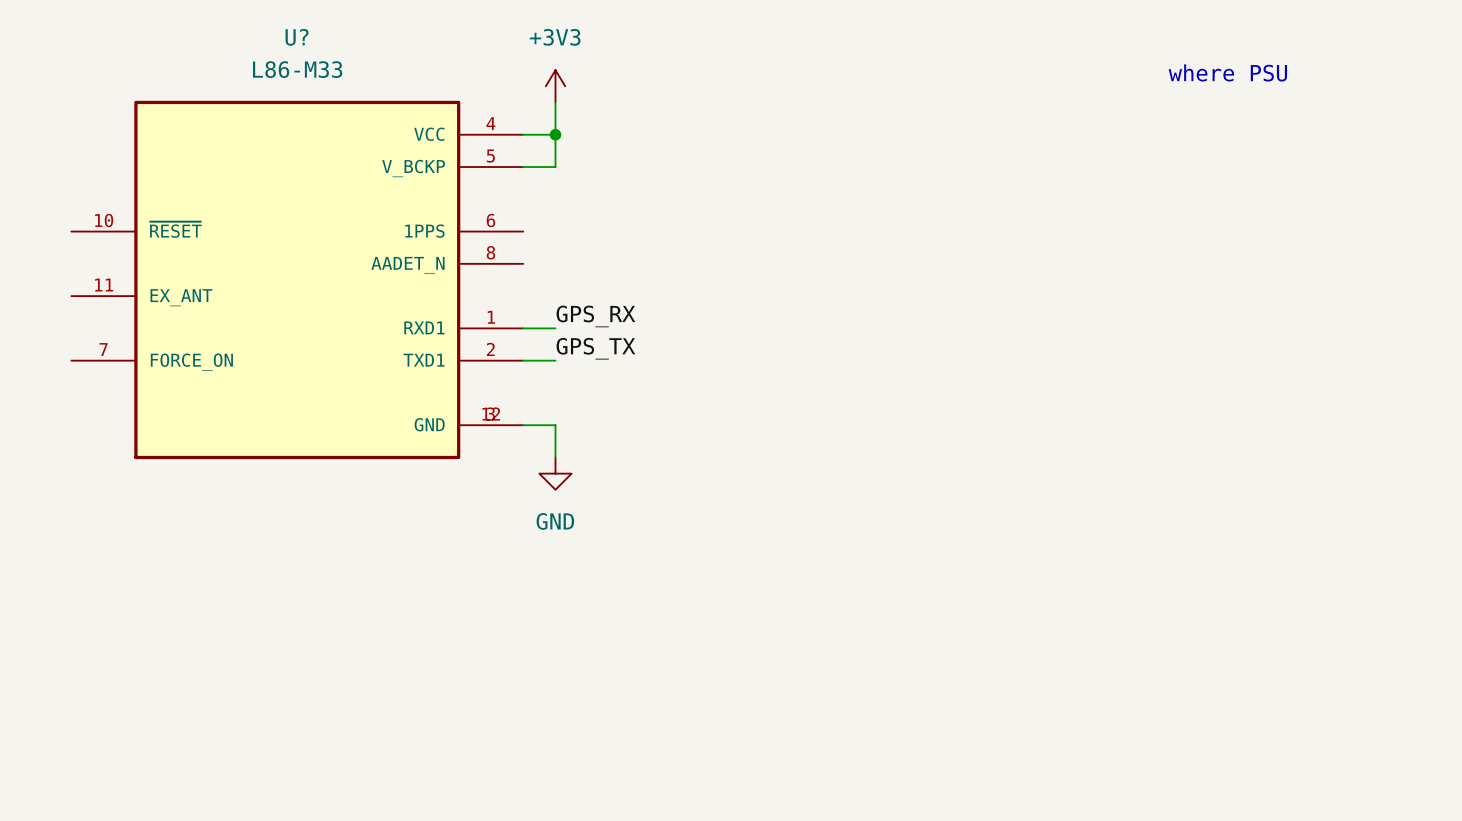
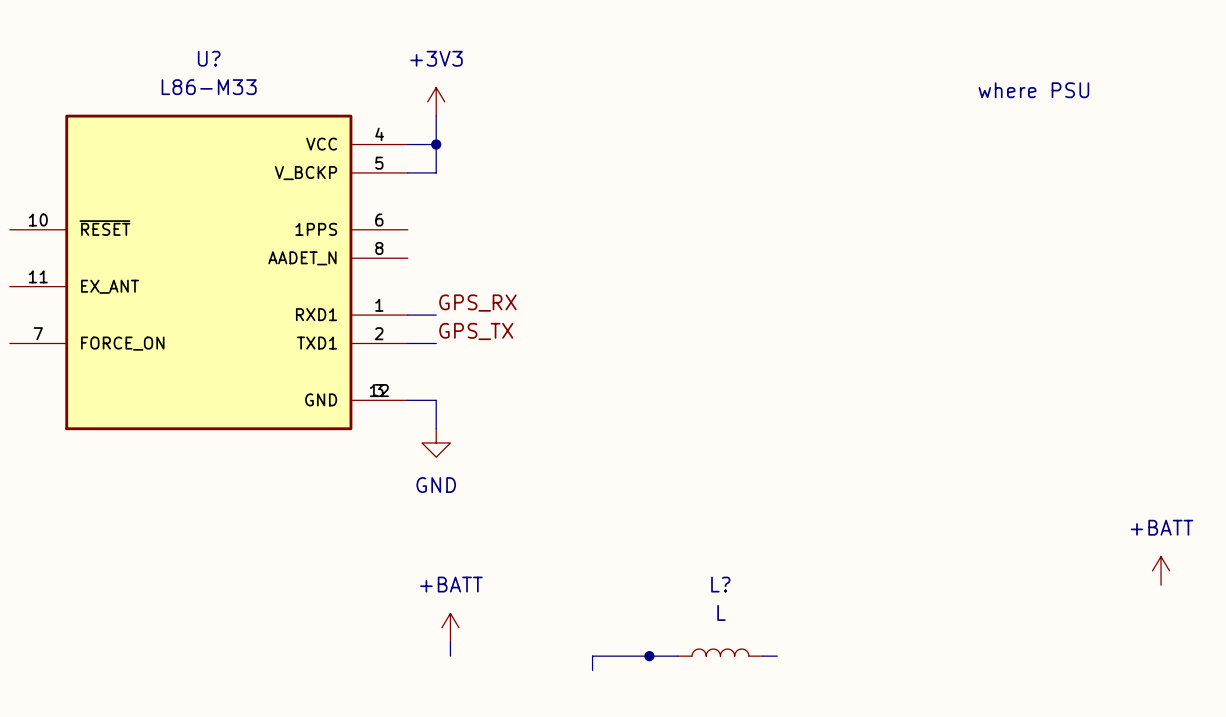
power symbol: none -> +BATT (1161, 570)
power symbol: none -> +BATT (450, 627)
wire: none -> (450, 641) (450, 656)
L?: none -> L (720, 652)
junction: none -> (649, 656)
wire: none -> (677, 656) (592, 656) (592, 670)
wire: none -> (763, 656) (777, 656)

